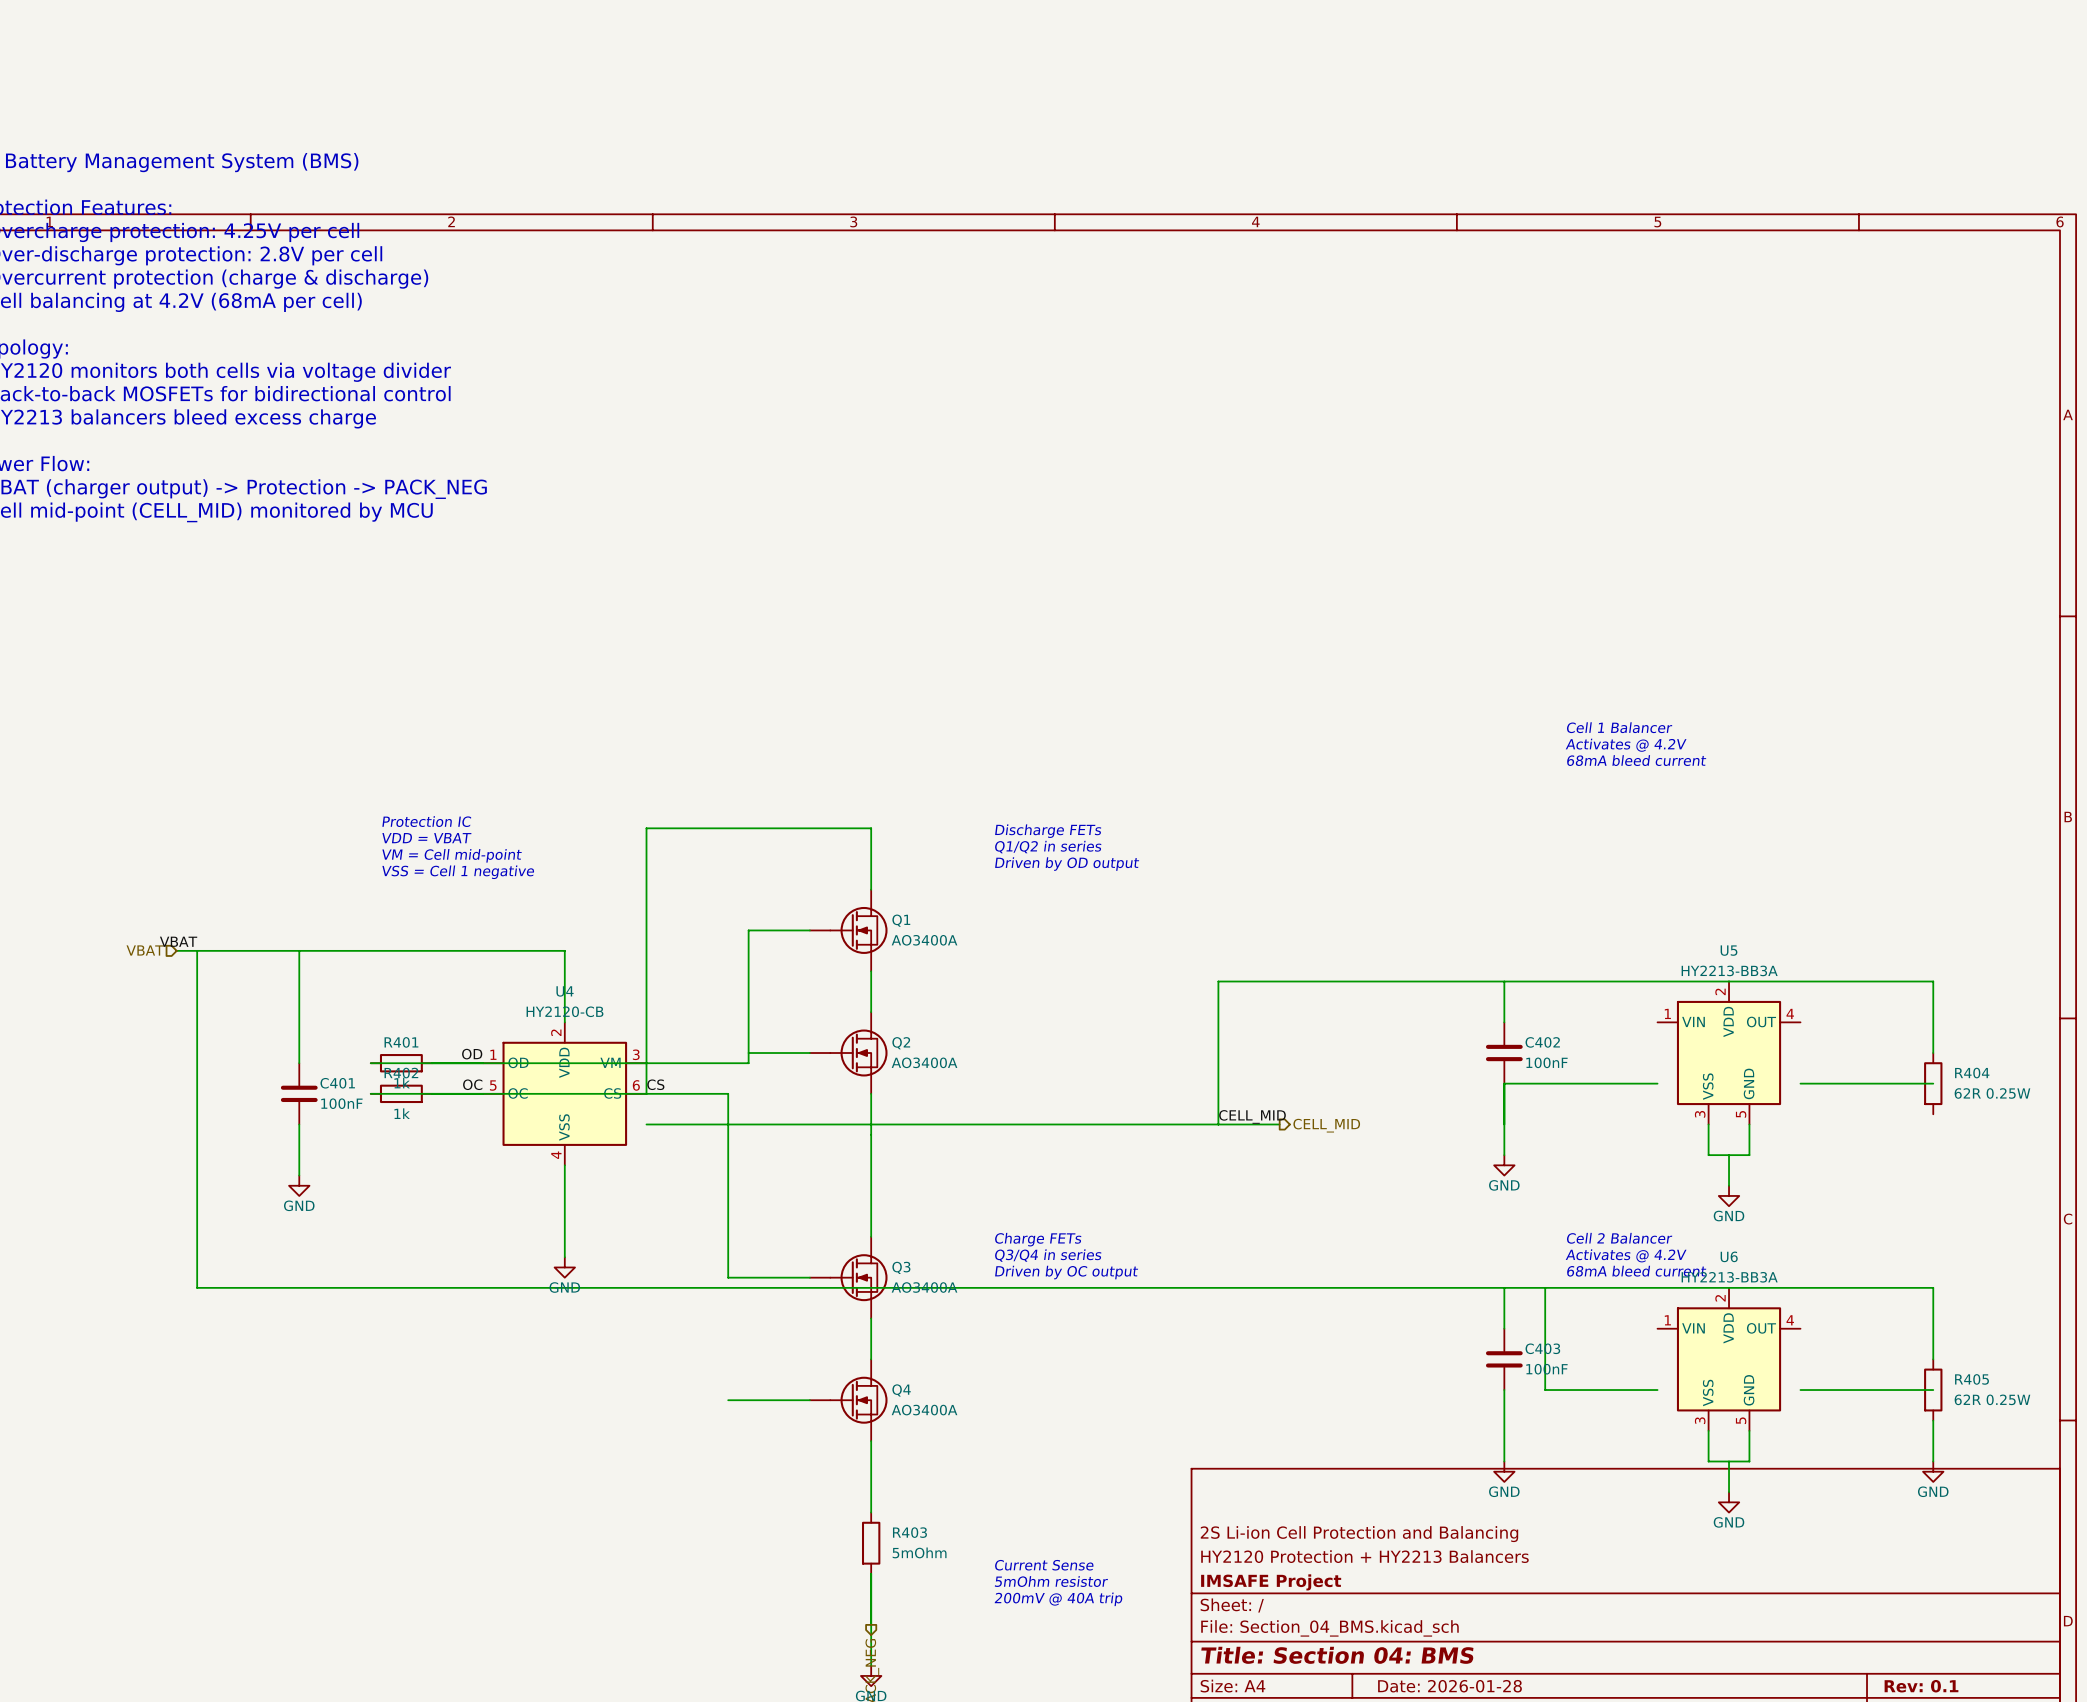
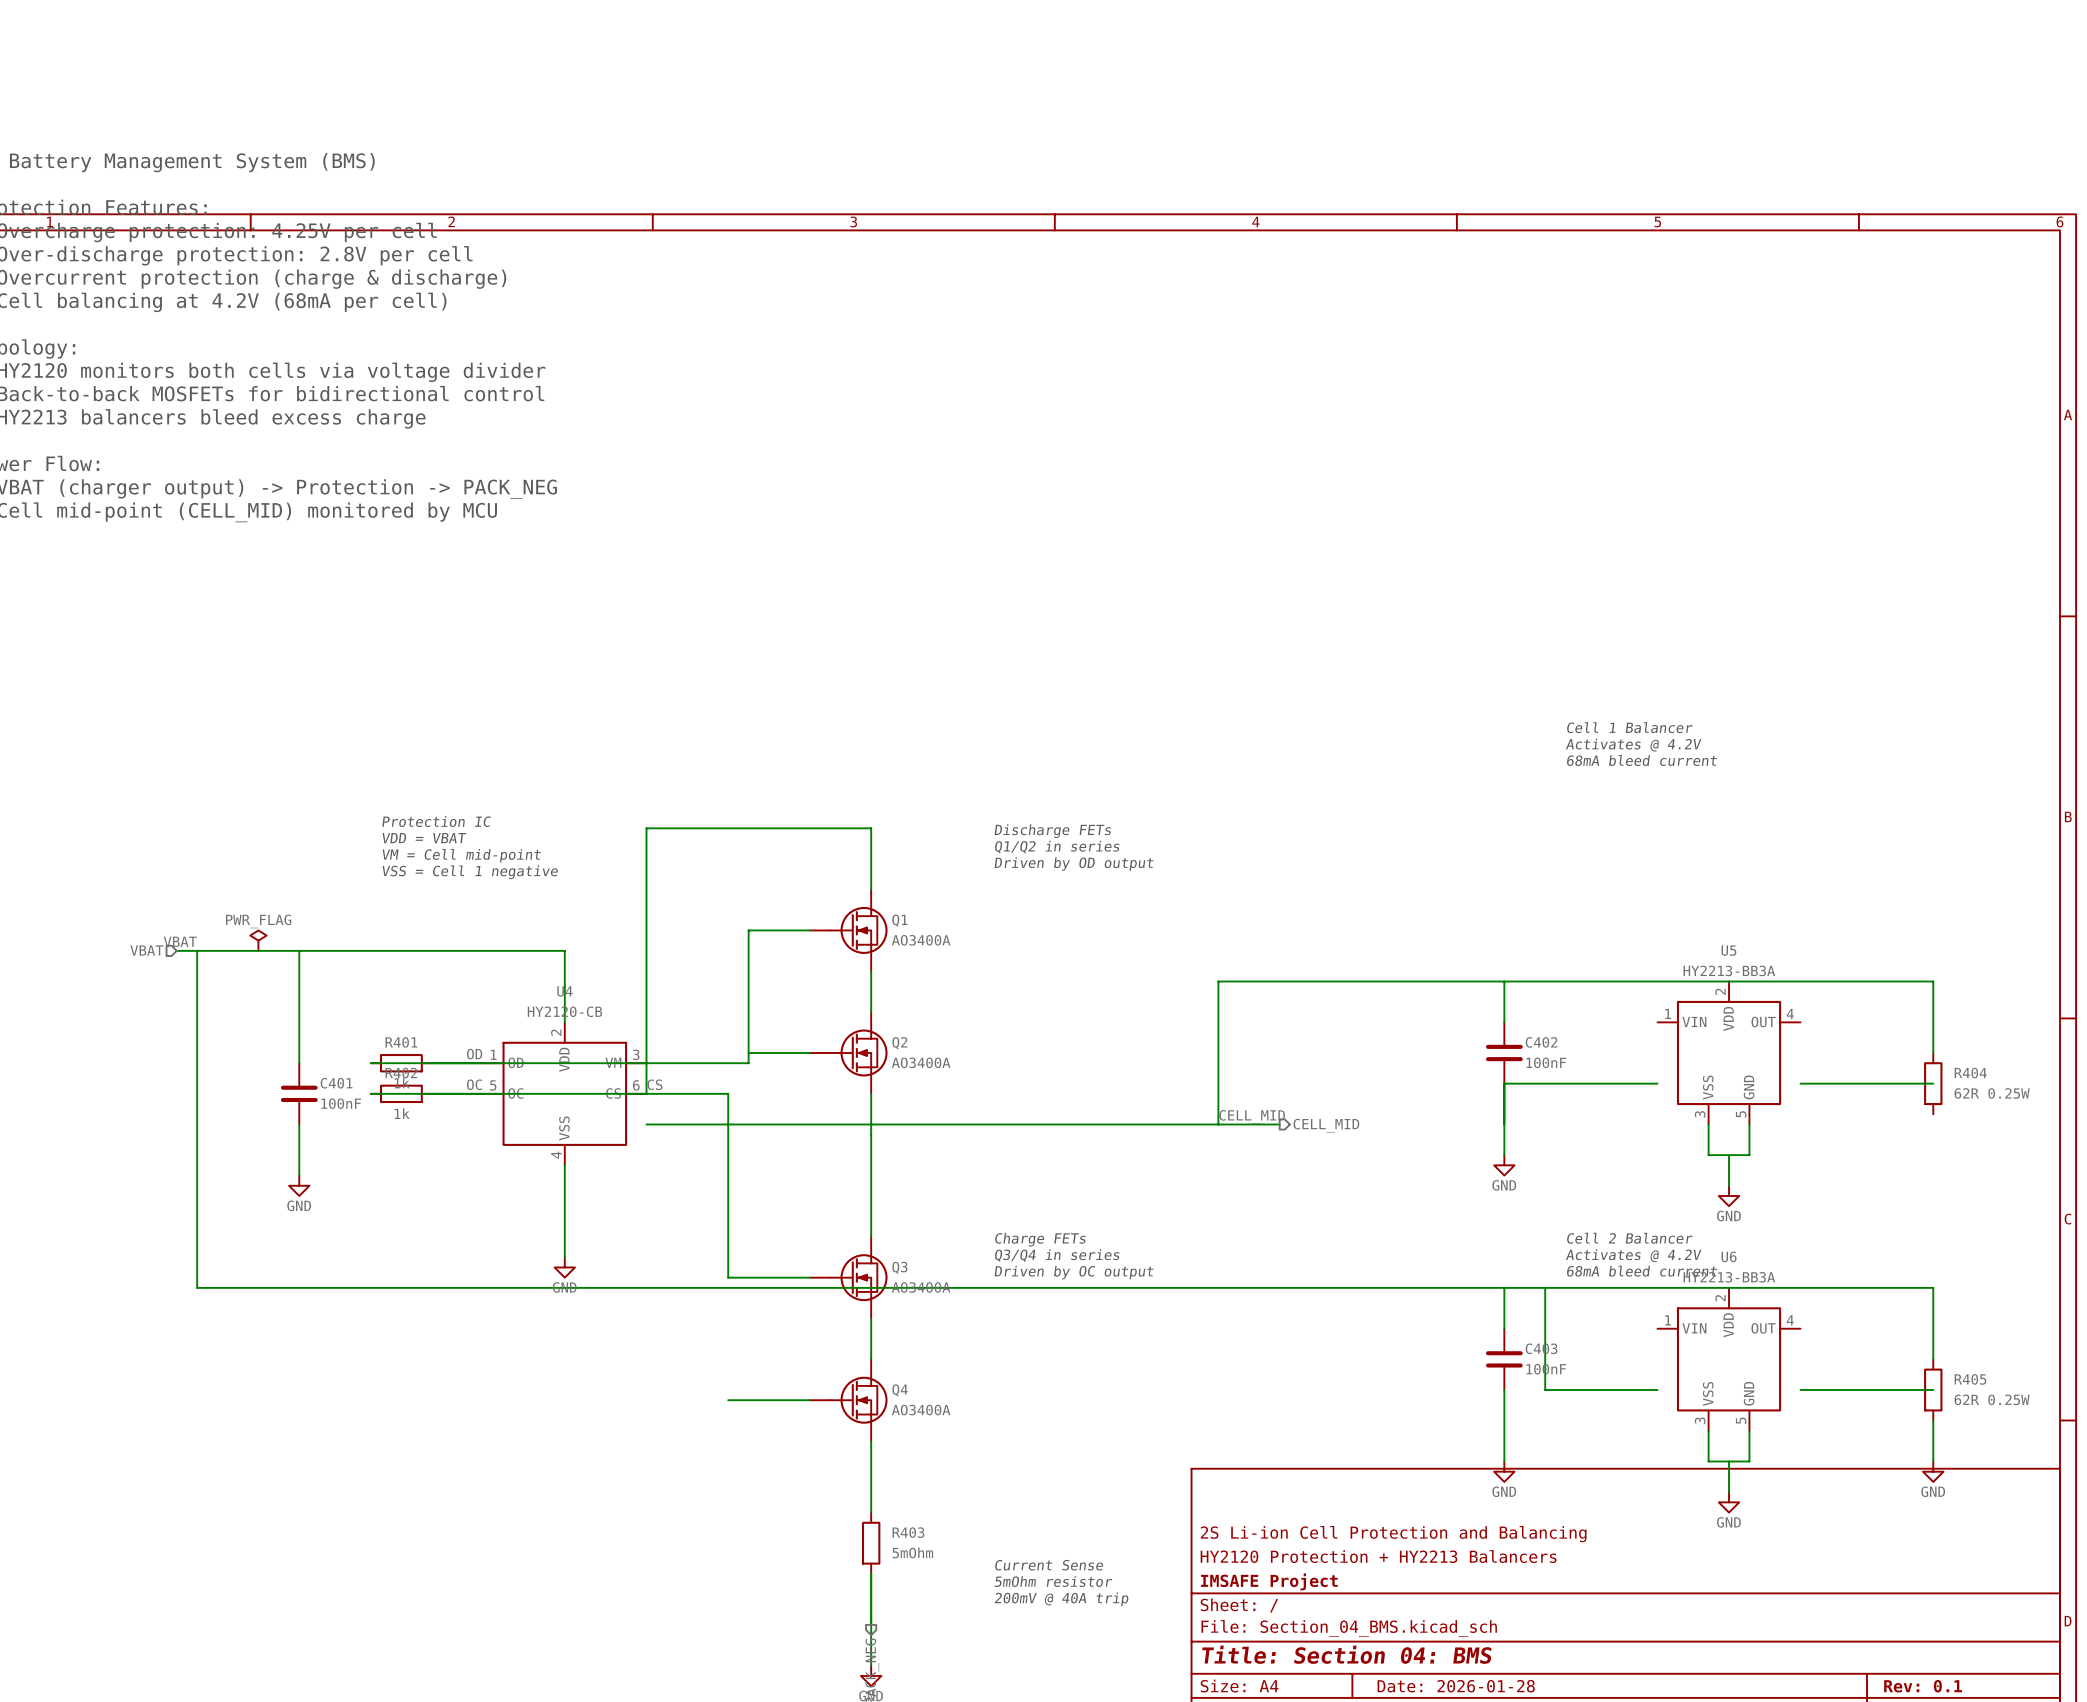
power symbol: none -> PWR_FLAG (258, 940)

